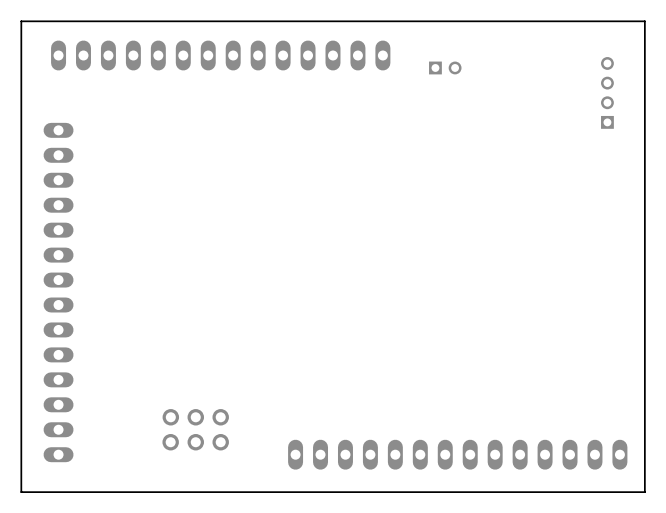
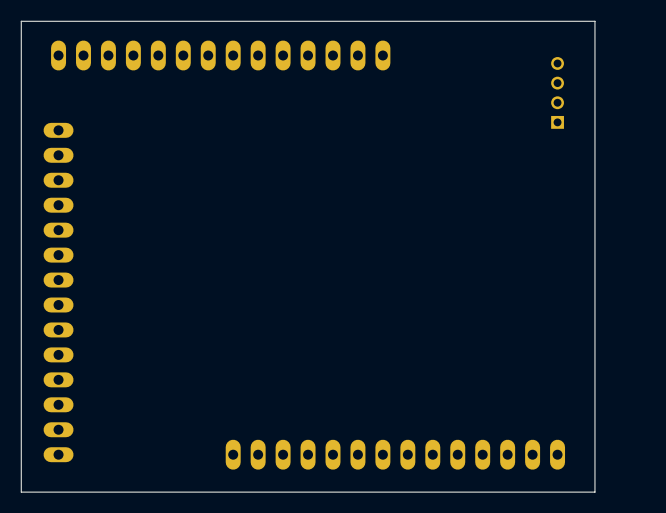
board edge: (594, 21) (644, 21) (644, 492) (594, 492) -> (594, 21) (594, 492)
part: (445, 67) -> none
part position: (607, 92) -> (557, 92)
part: (195, 429) -> none
part position: (457, 454) -> (395, 454)

